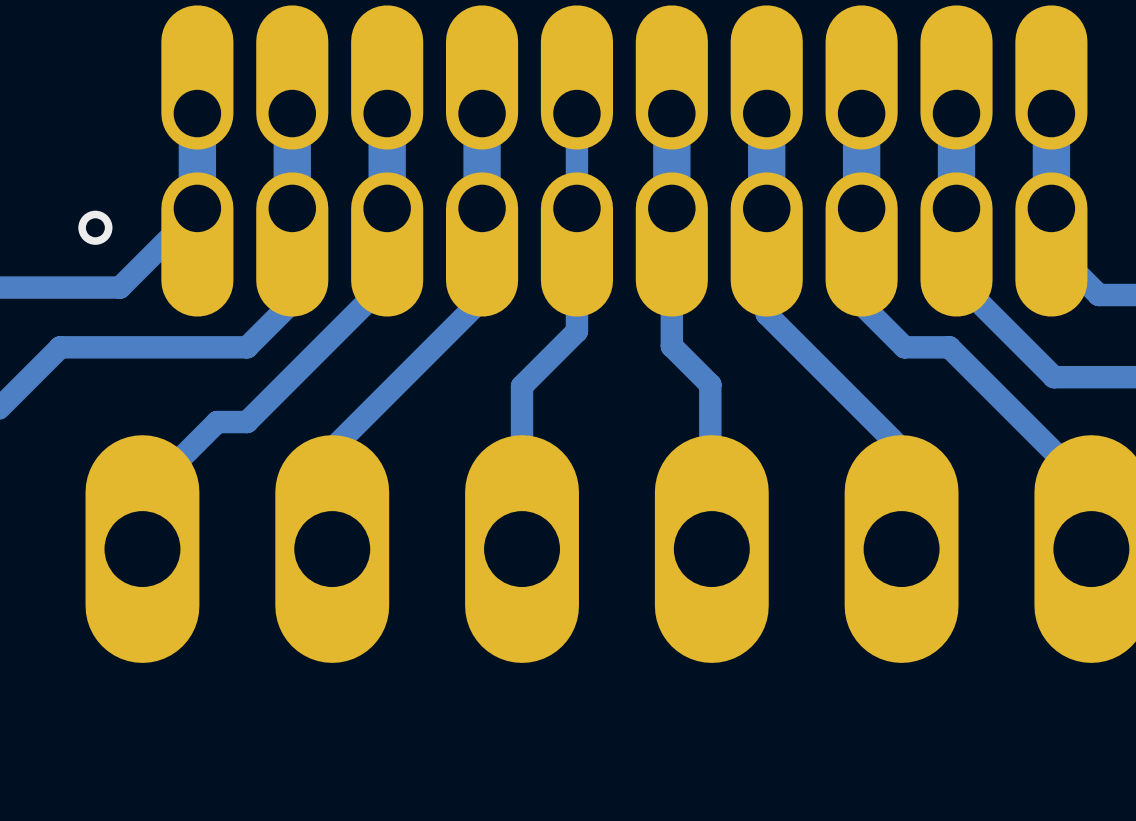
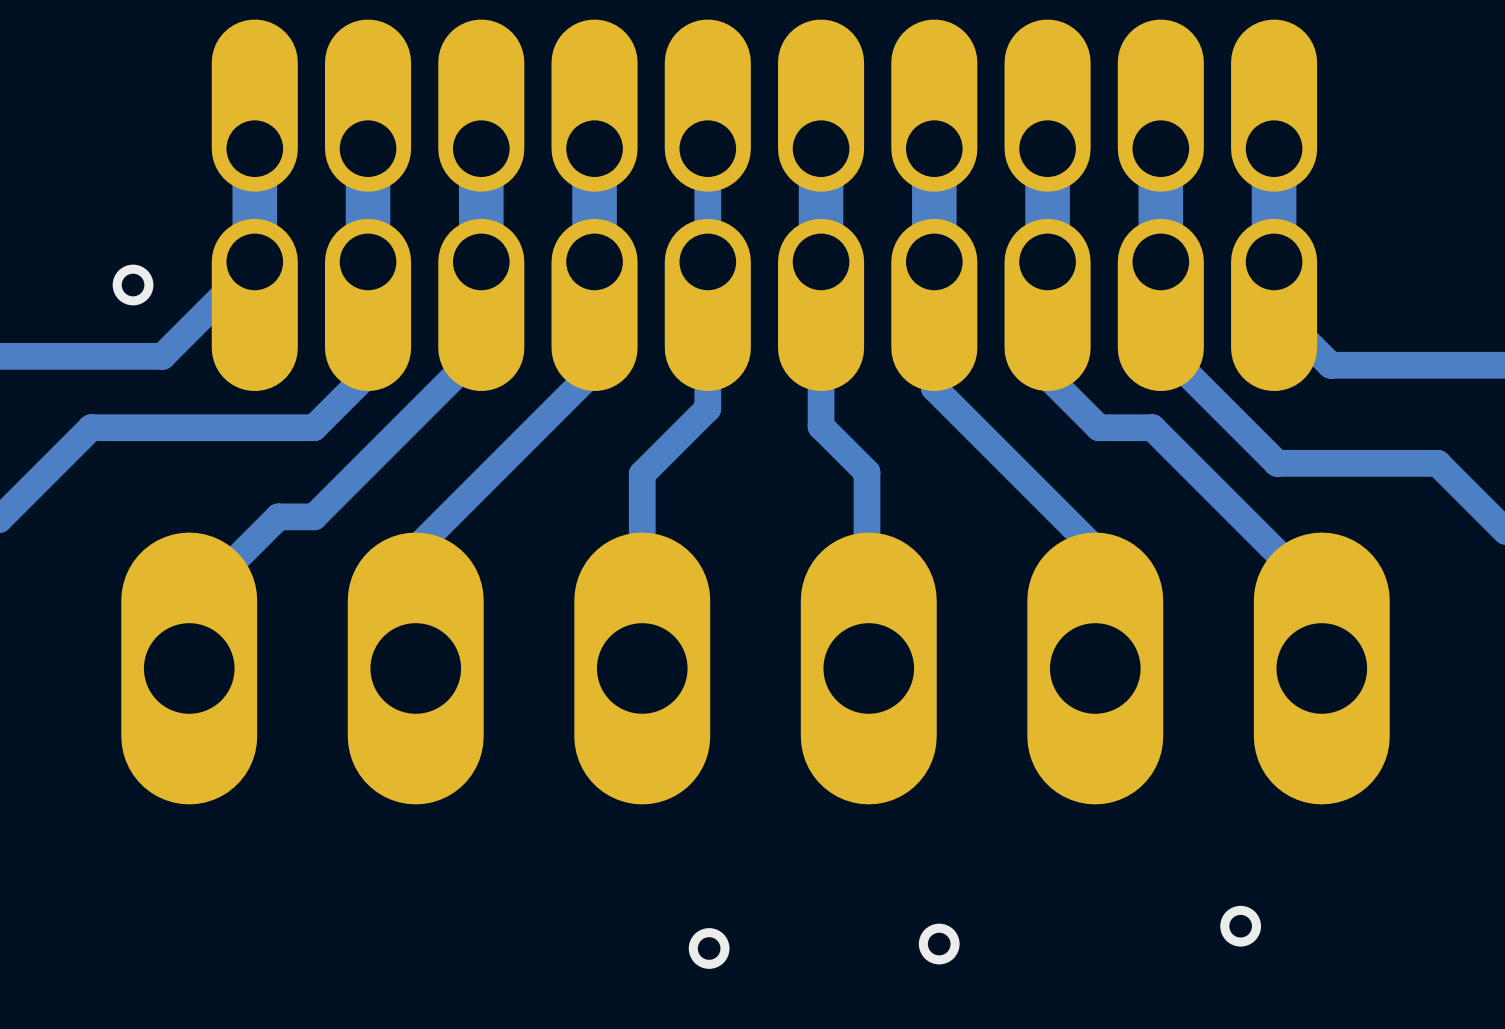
via: none -> (1240, 926)
via: none -> (939, 944)
via: none -> (709, 948)

